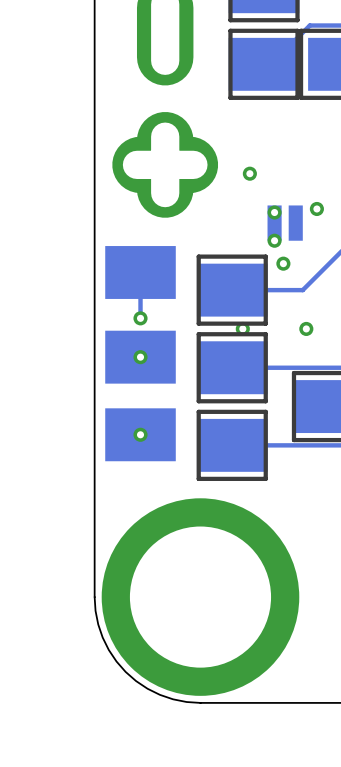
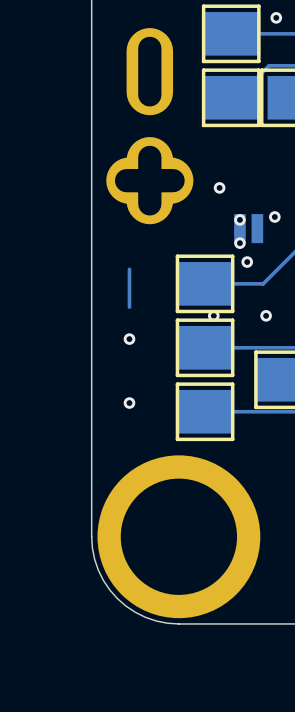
part: (140, 272) -> none
via: (140, 318) -> none
part: (140, 357) -> none
part: (140, 434) -> none

